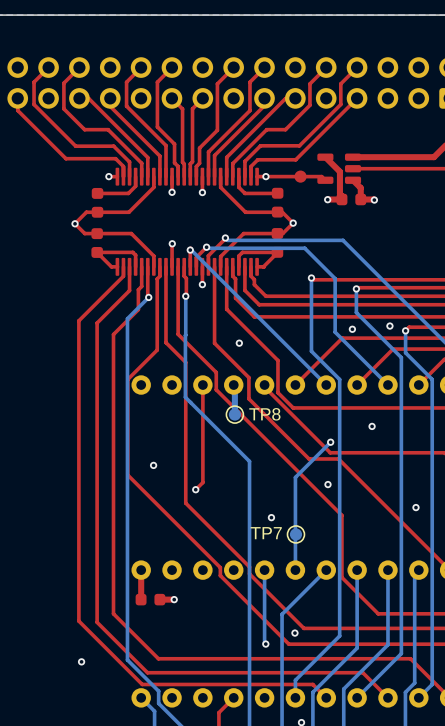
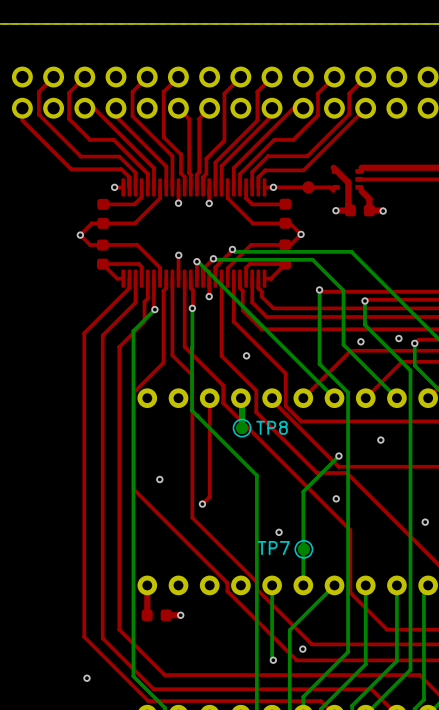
part footprint: [317, 153, 362, 184] -> [331, 168, 364, 190]

